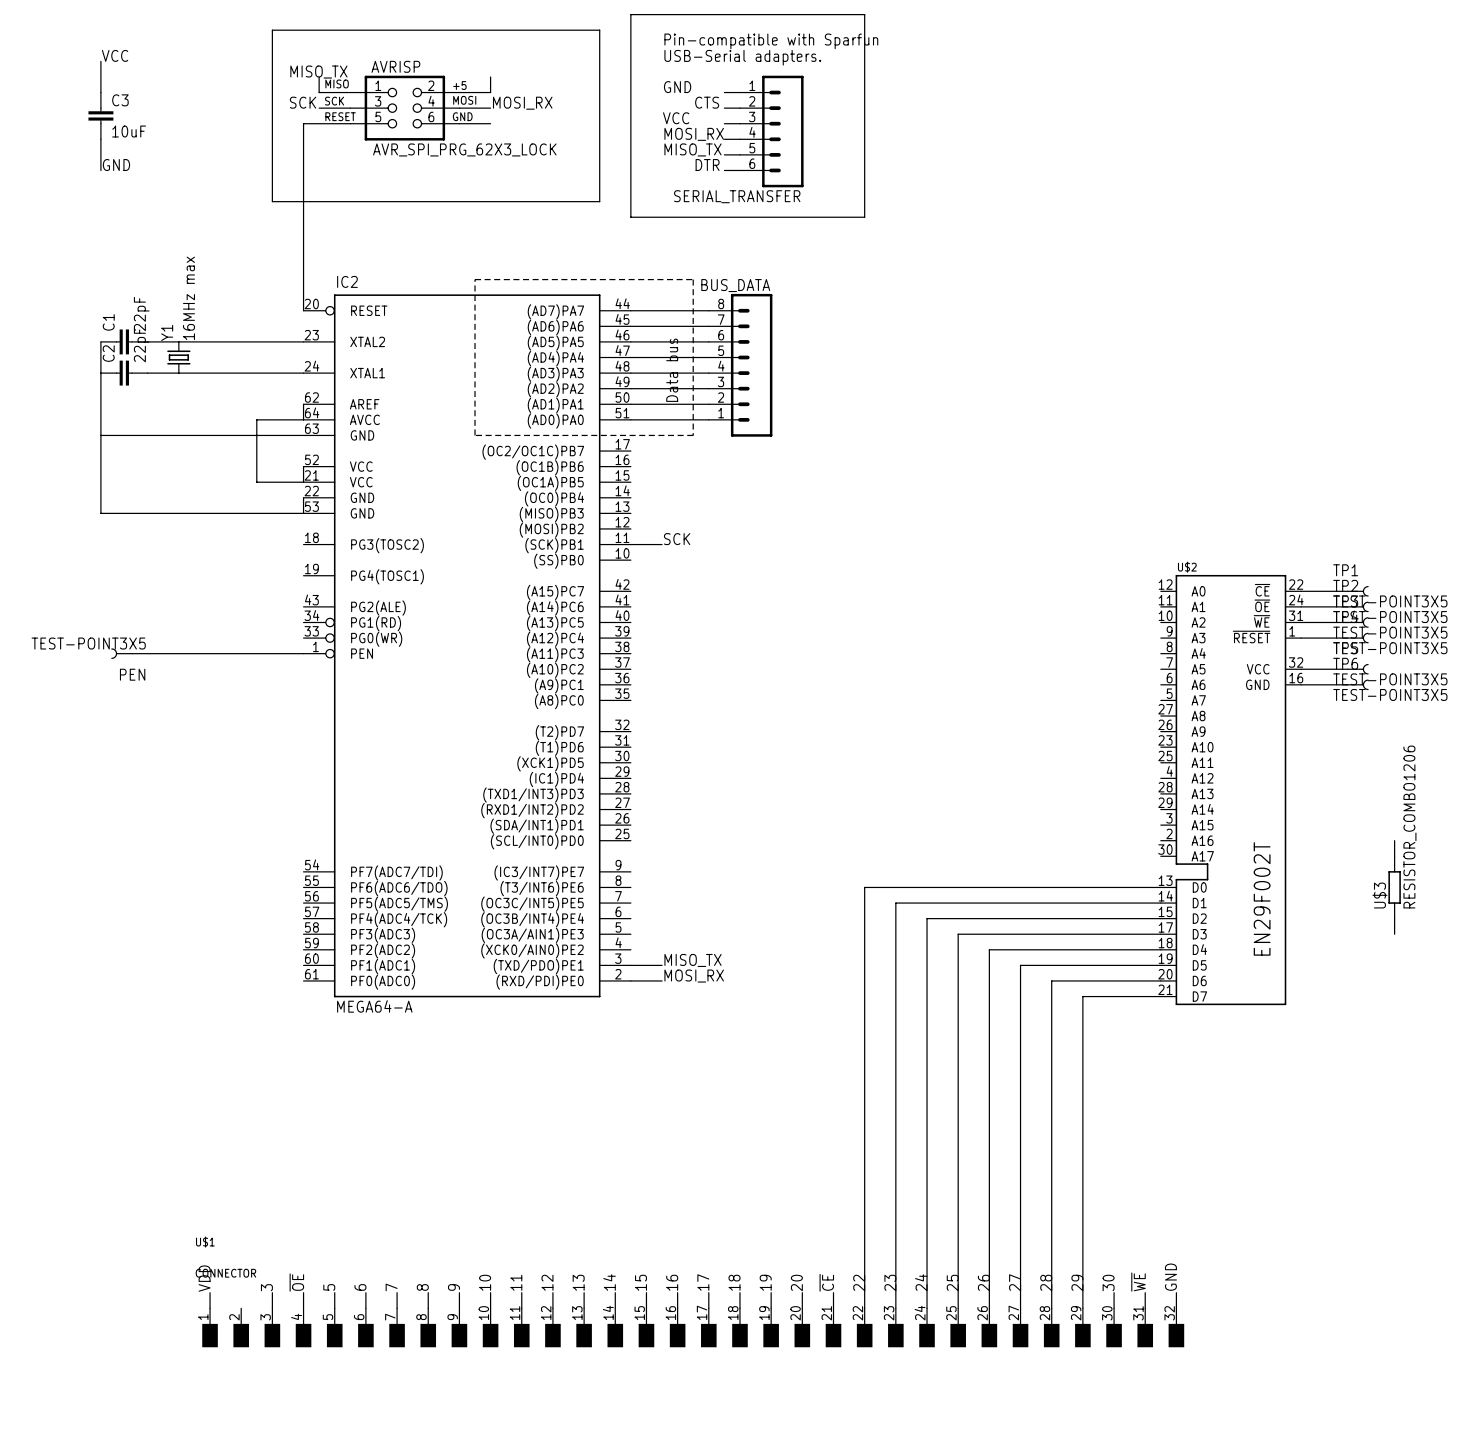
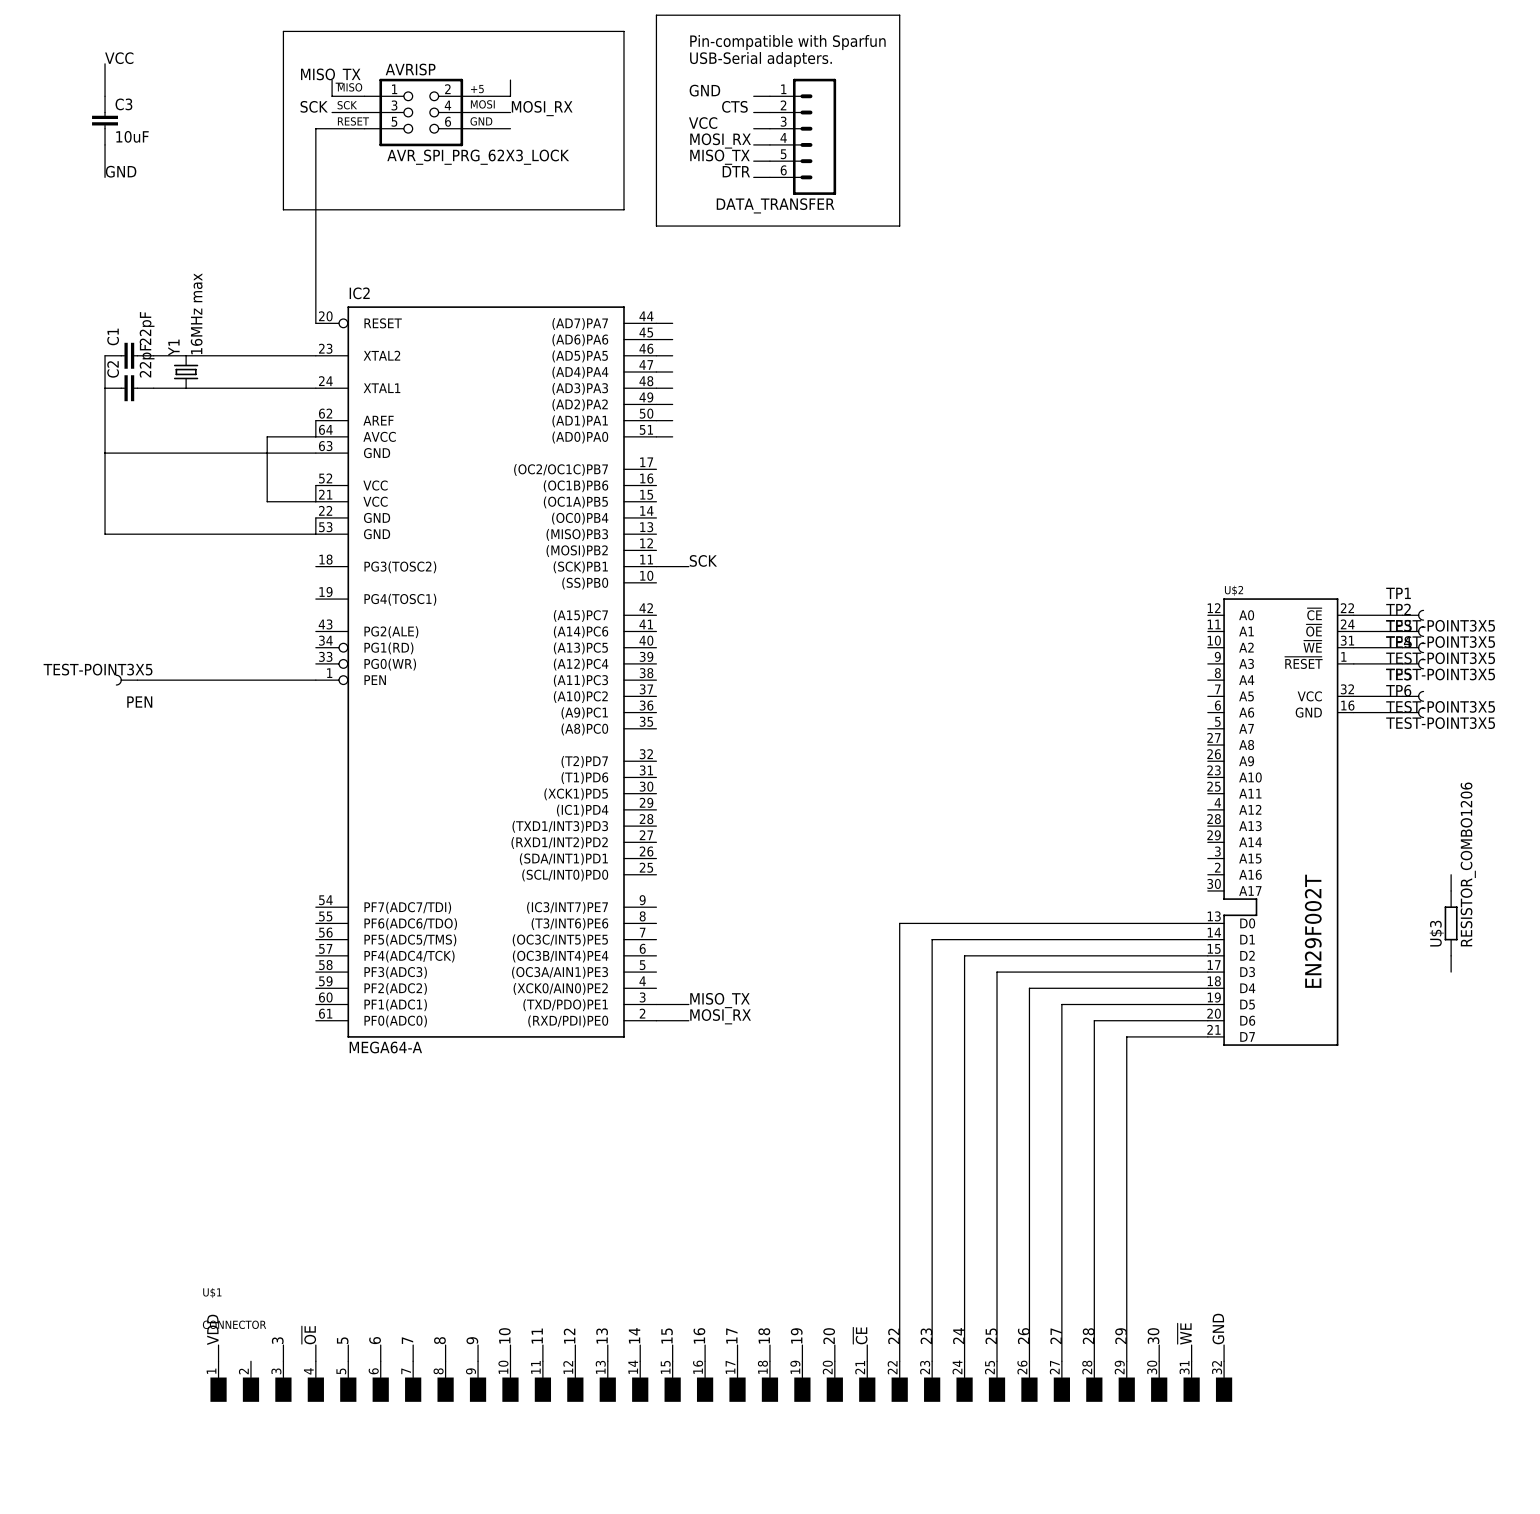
SERIAL_TRANSFER name: SERIAL_TRANSFER (737, 196) -> DATA_TRANSFER (775, 205)
line: (475, 279) (693, 279) (693, 435) (475, 435) (475, 279) -> none
wire: (646, 310) (708, 310) -> none
wire: (646, 326) (708, 326) -> none
wire: (646, 341) (708, 341) -> none
wire: (646, 357) (708, 357) -> none
BUS_DATA: (740, 365) -> none
text: Data bus (672, 370) -> none
wire: (646, 373) (708, 373) -> none
wire: (646, 388) (708, 388) -> none
wire: (646, 404) (708, 404) -> none
wire: (646, 419) (708, 419) -> none

